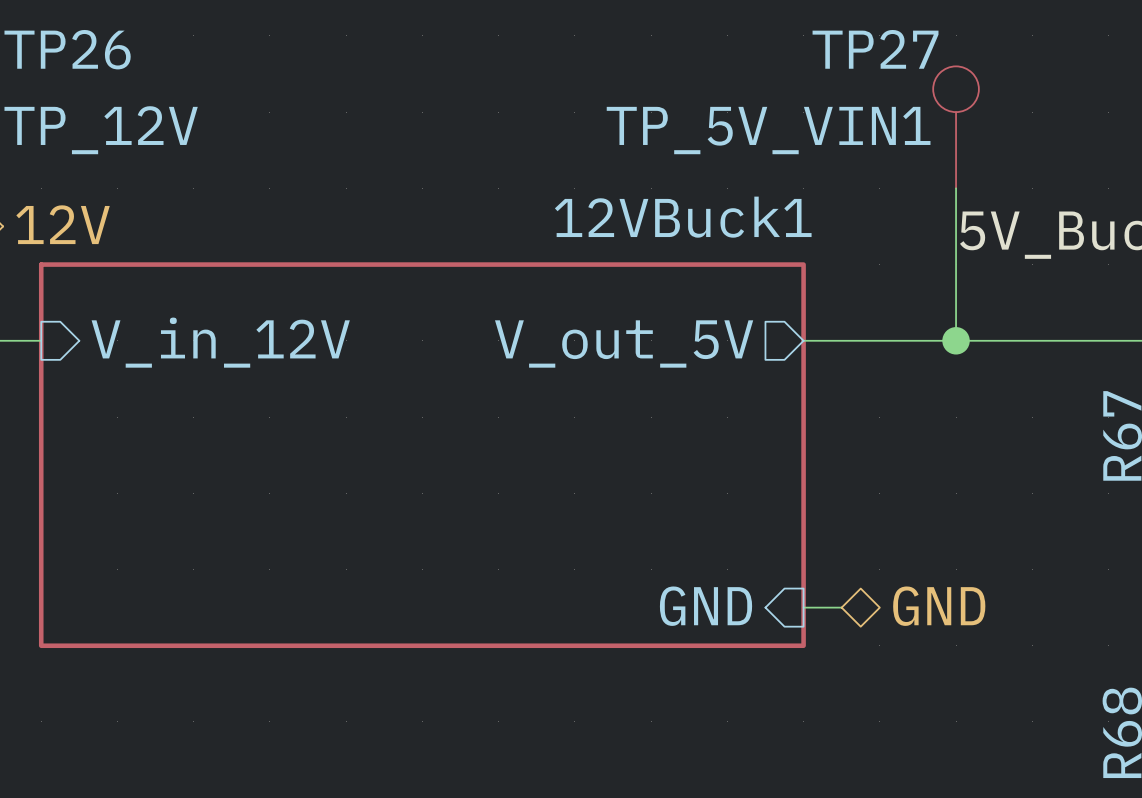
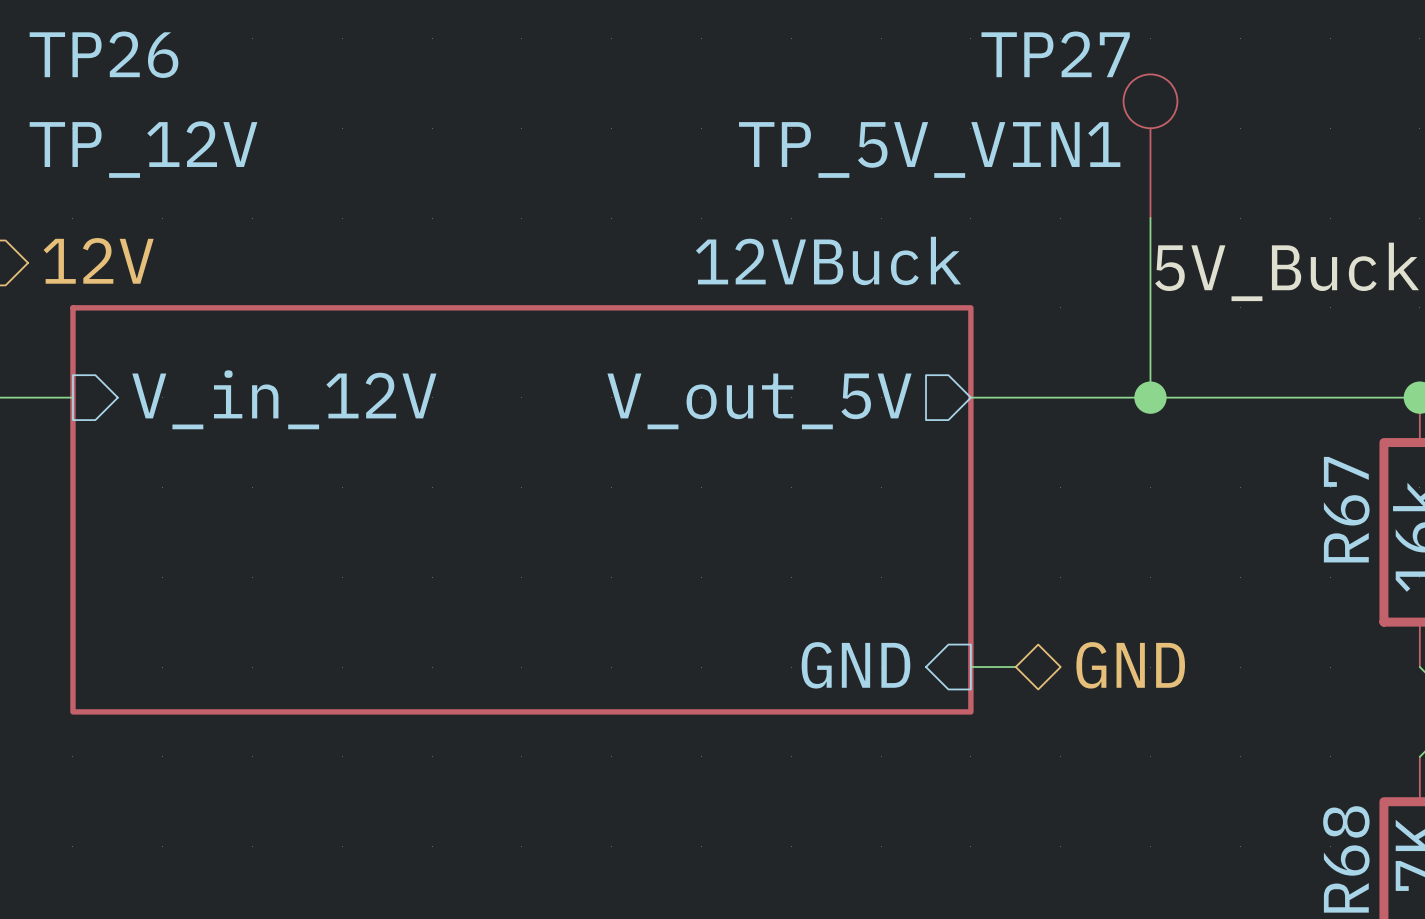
sheet 12VBuck: none -> (521, 509)
sheet 12VBuck1: (422, 455) -> none
sheet pin position: GND (706, 606) -> GND (855, 665)
hierarchical label position: GND (939, 606) -> GND (1130, 665)
wire: (803, 607) (841, 607) -> (970, 667) (1015, 667)

